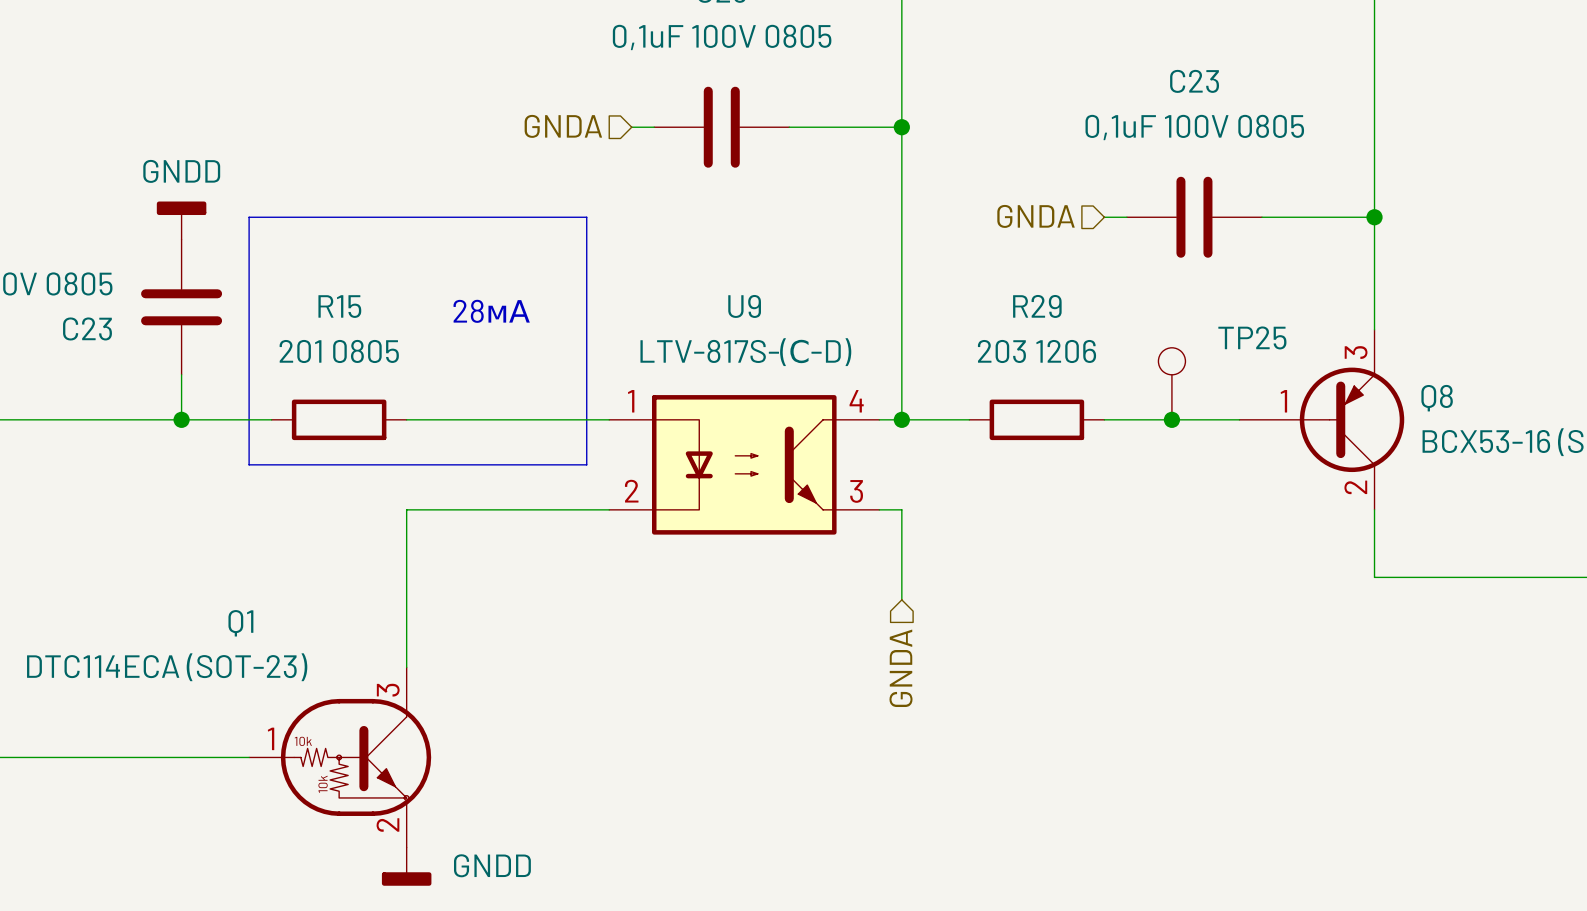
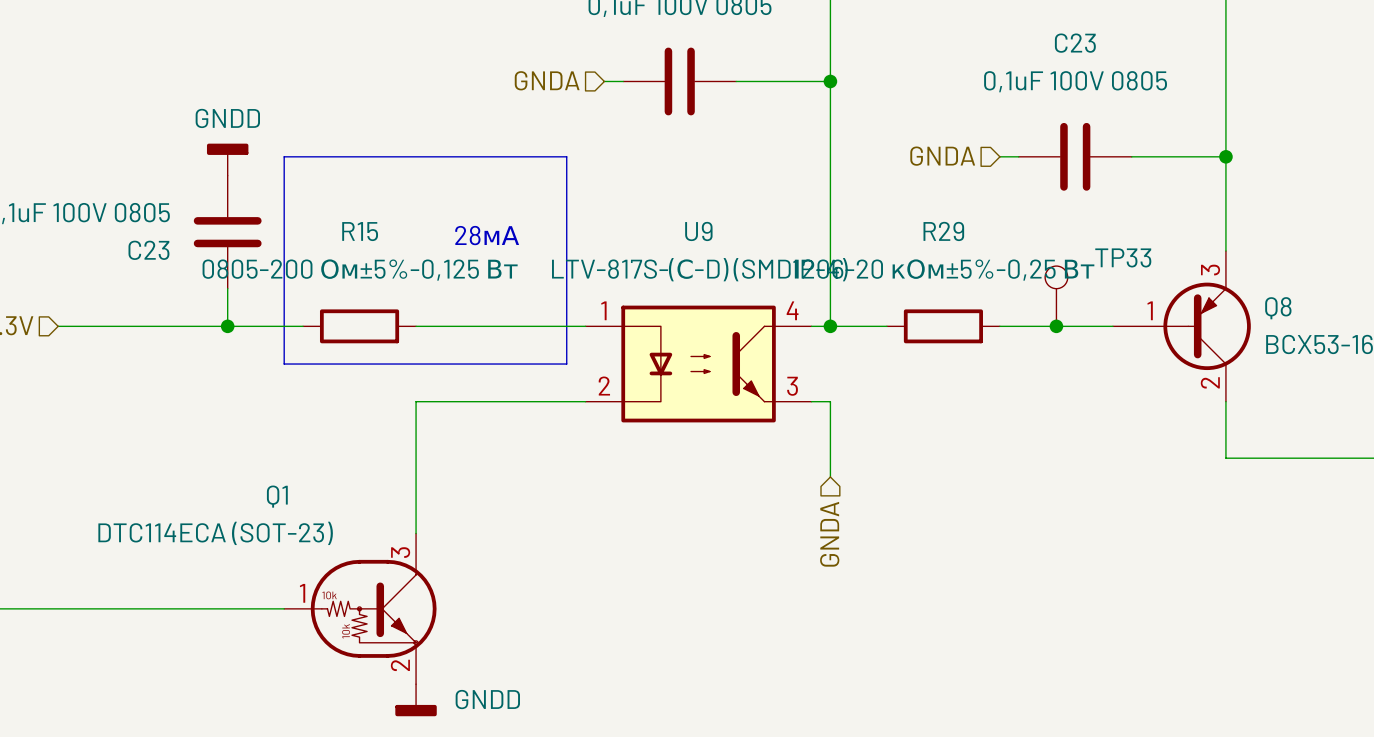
TP25 name: TP25 (1252, 337) -> TP33 (1123, 257)
R15 value: 201 0805 (339, 351) -> 0805-200 Ом±5%-0,125 Вт (360, 270)
R29 value: 203 1206 (1037, 351) -> 1206-20 кОм±5%-0,25 Вт (943, 270)
U9 value: LTV-817S-(С-D) (745, 352) -> LTV-817S-(С-D) (SMDIP-4) (699, 269)

